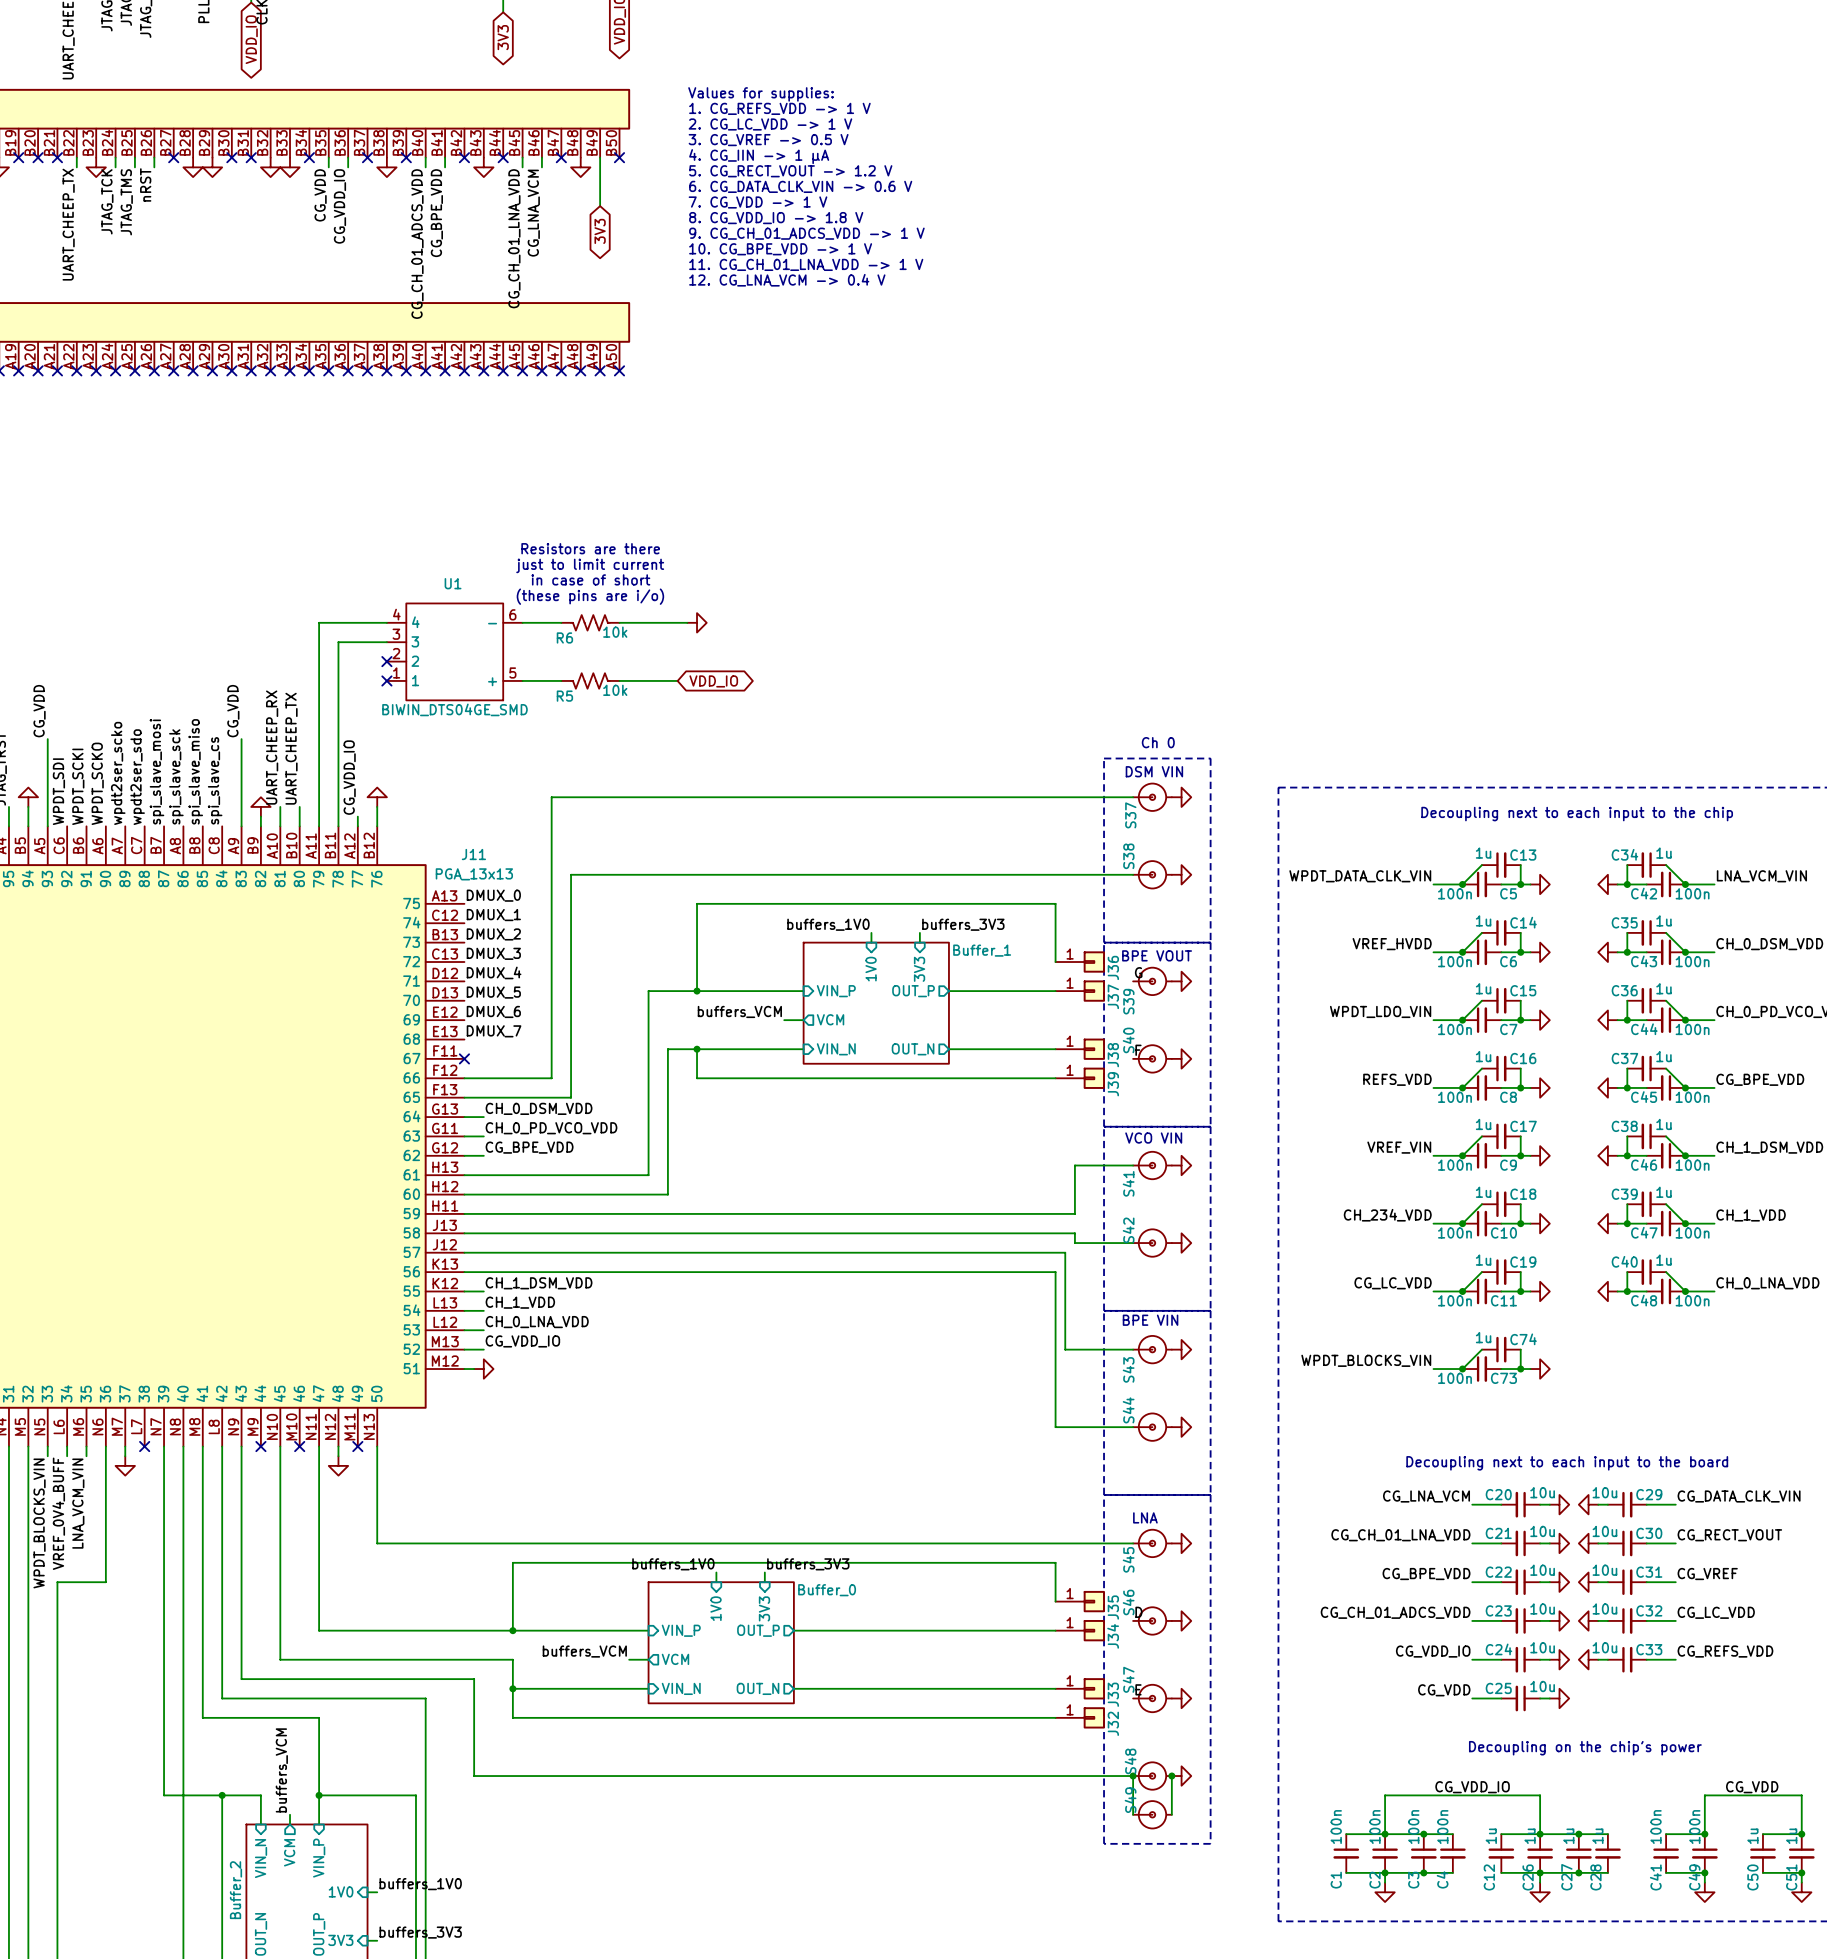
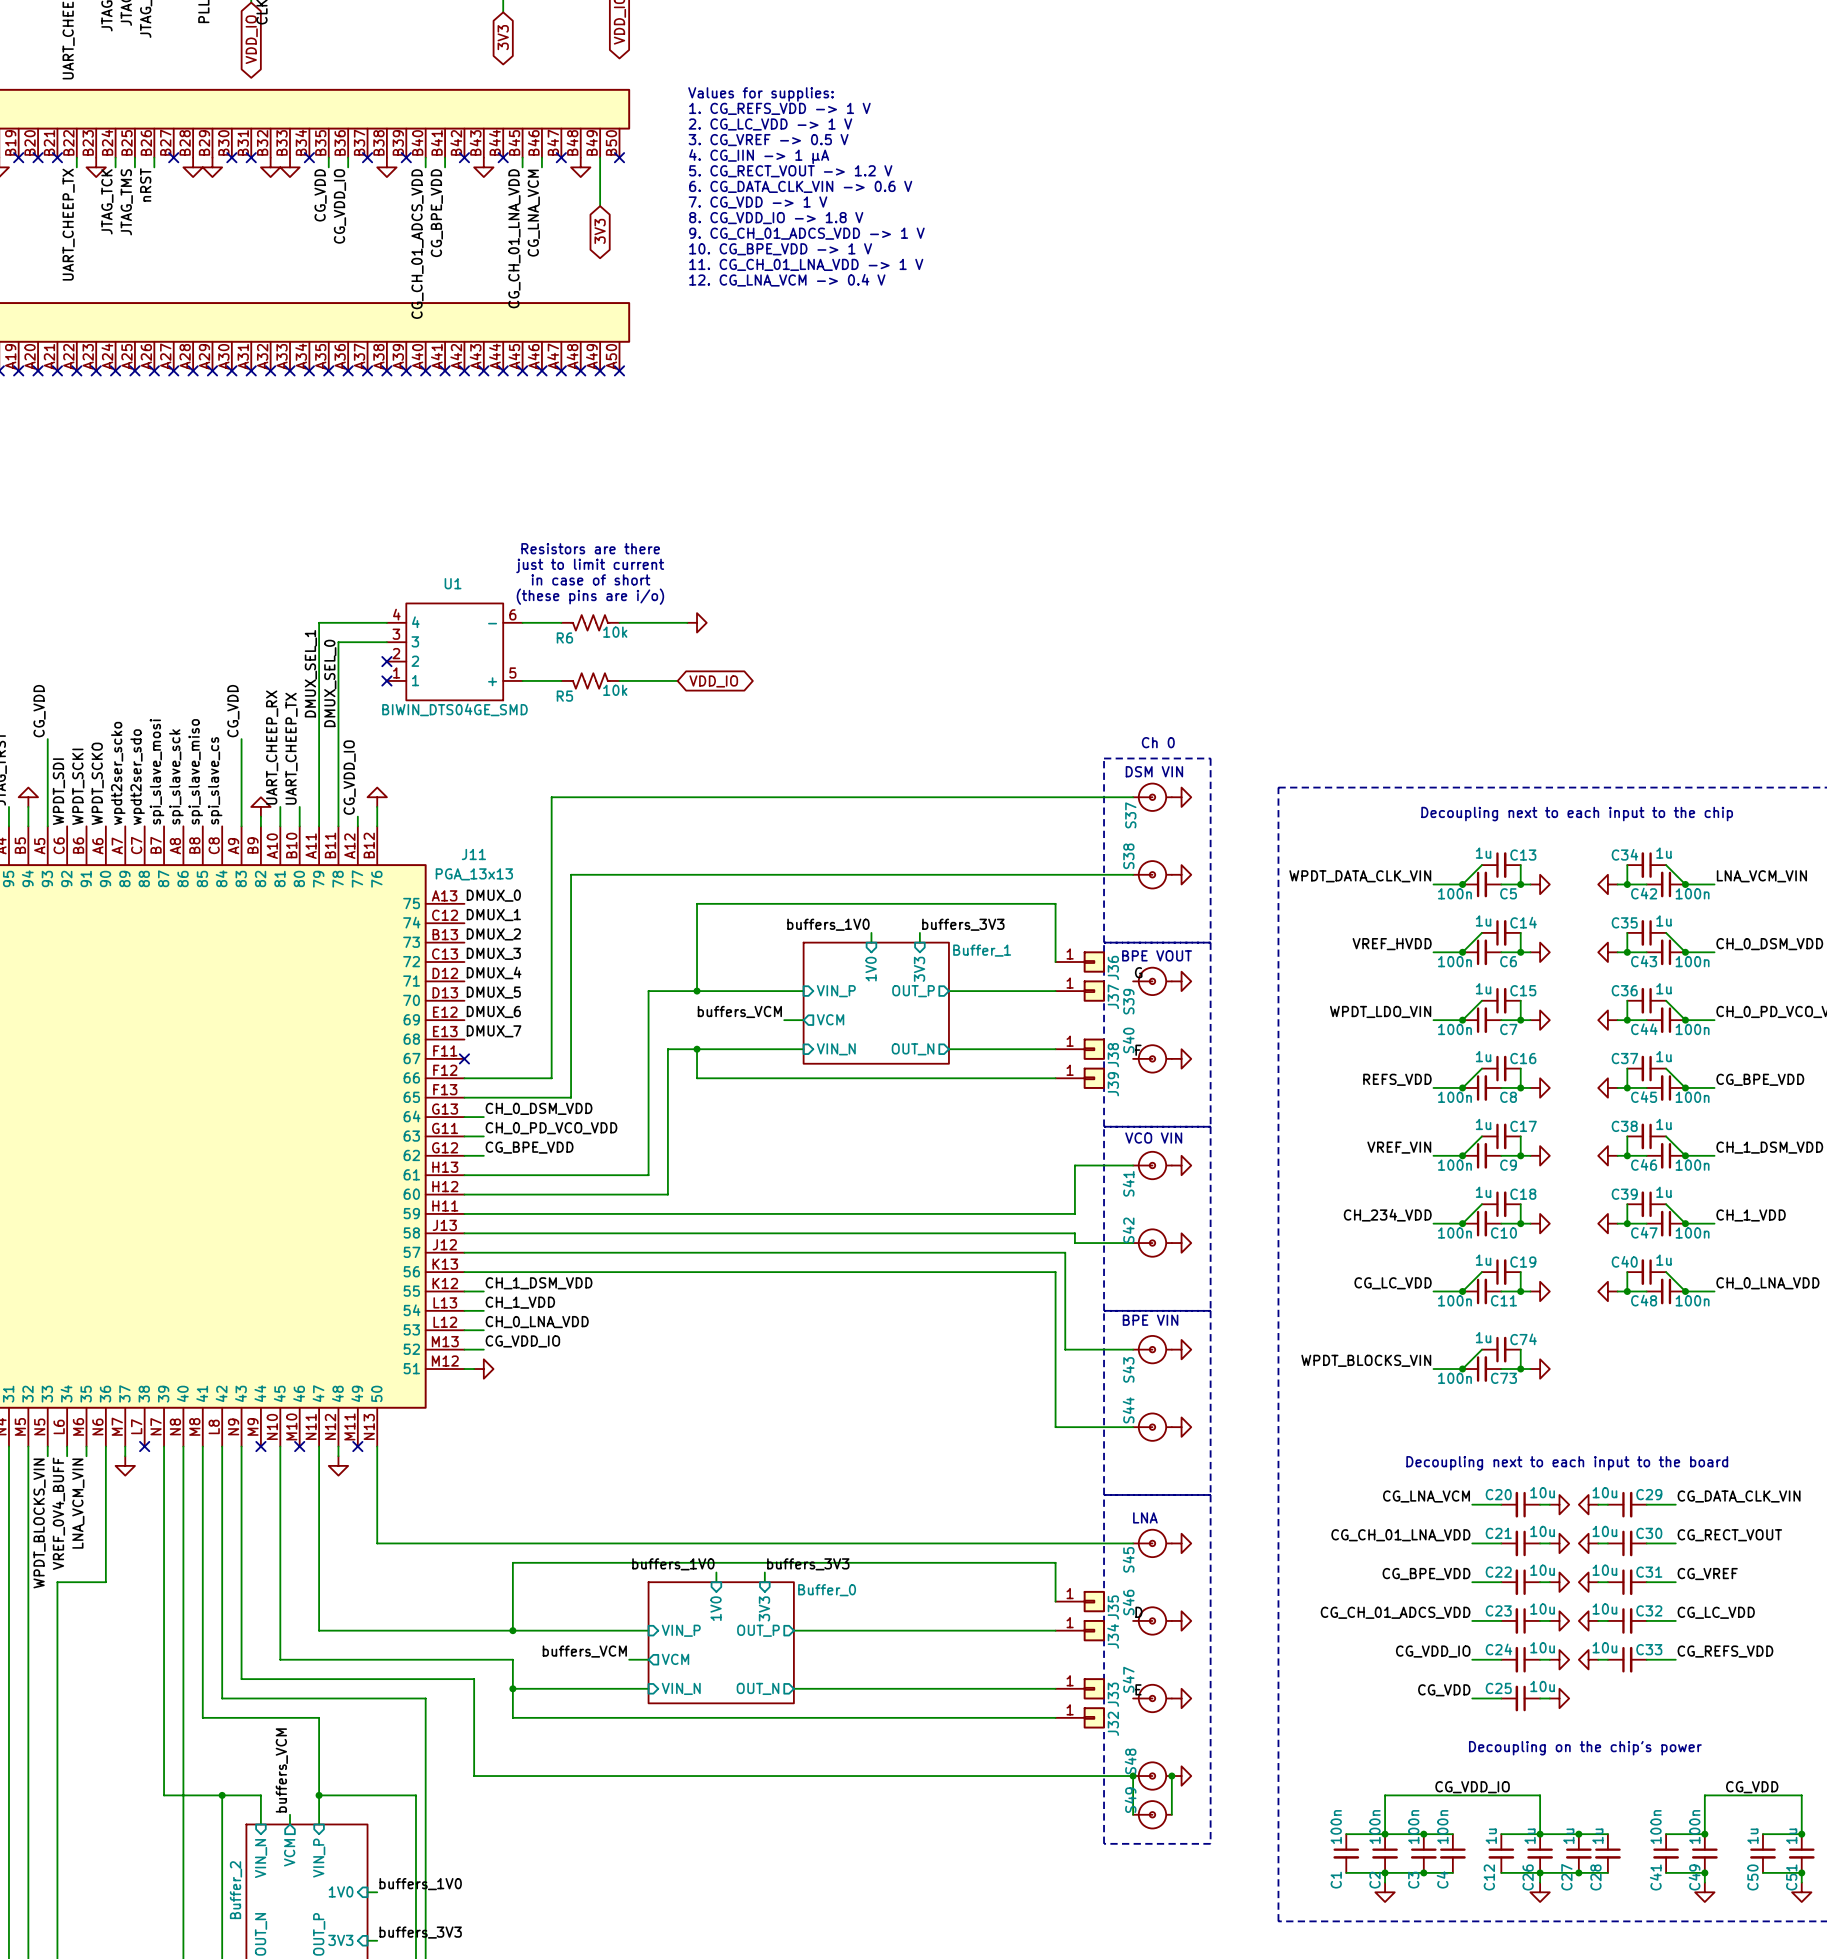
label: none -> DMUX_SEL_1 (310, 673)
label: none -> DMUX_SEL_0 (330, 683)

